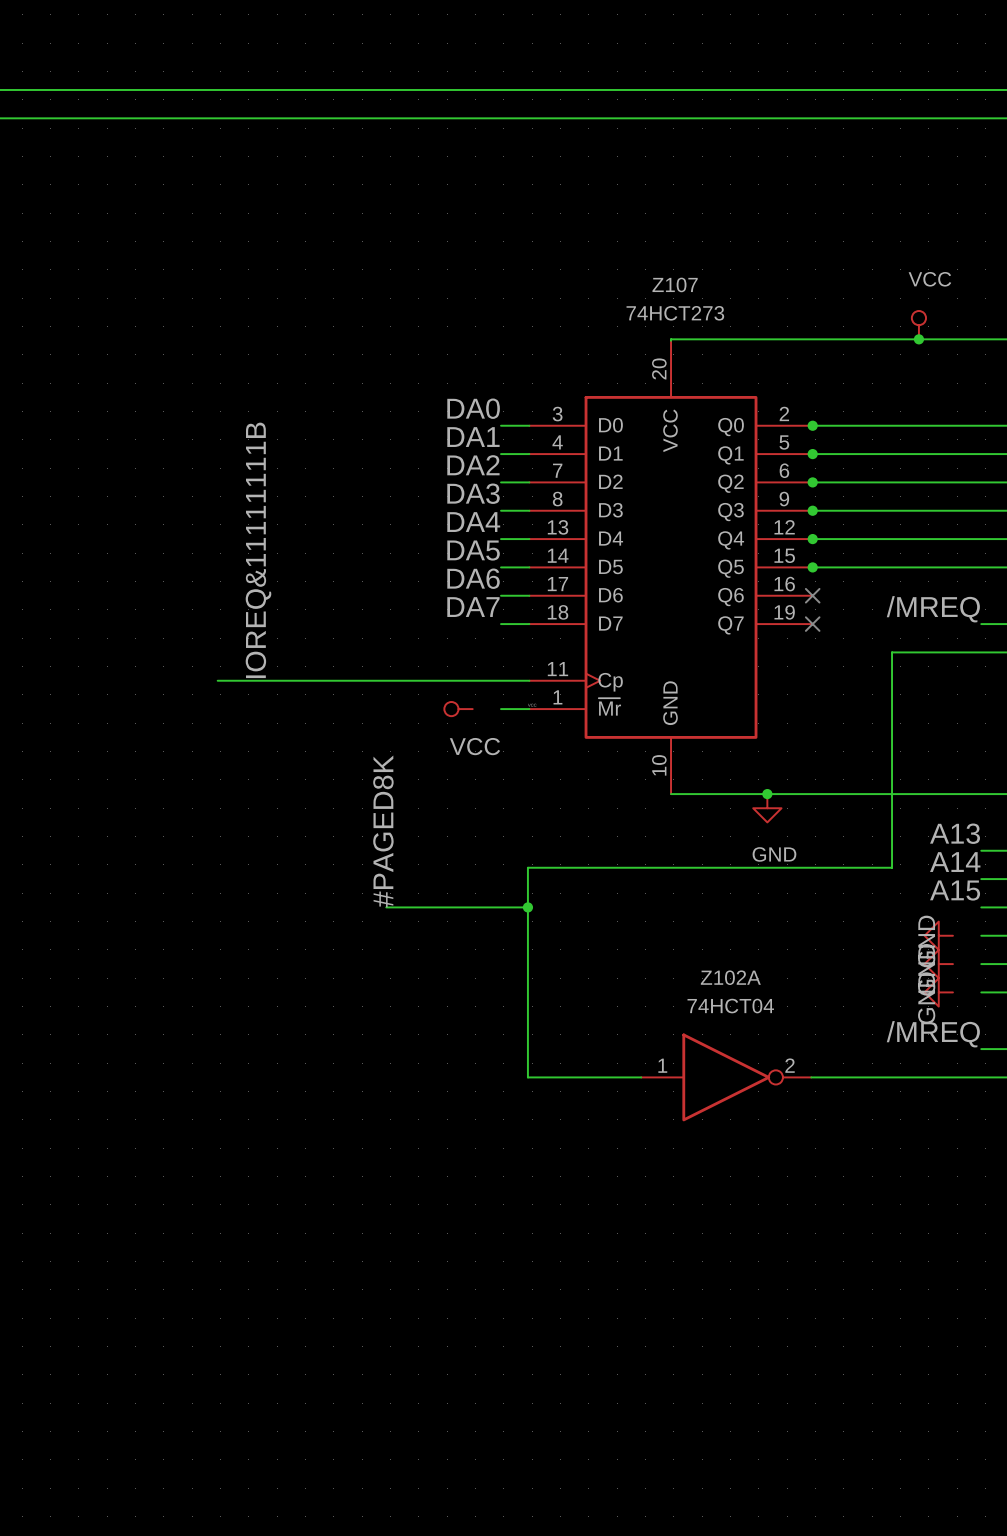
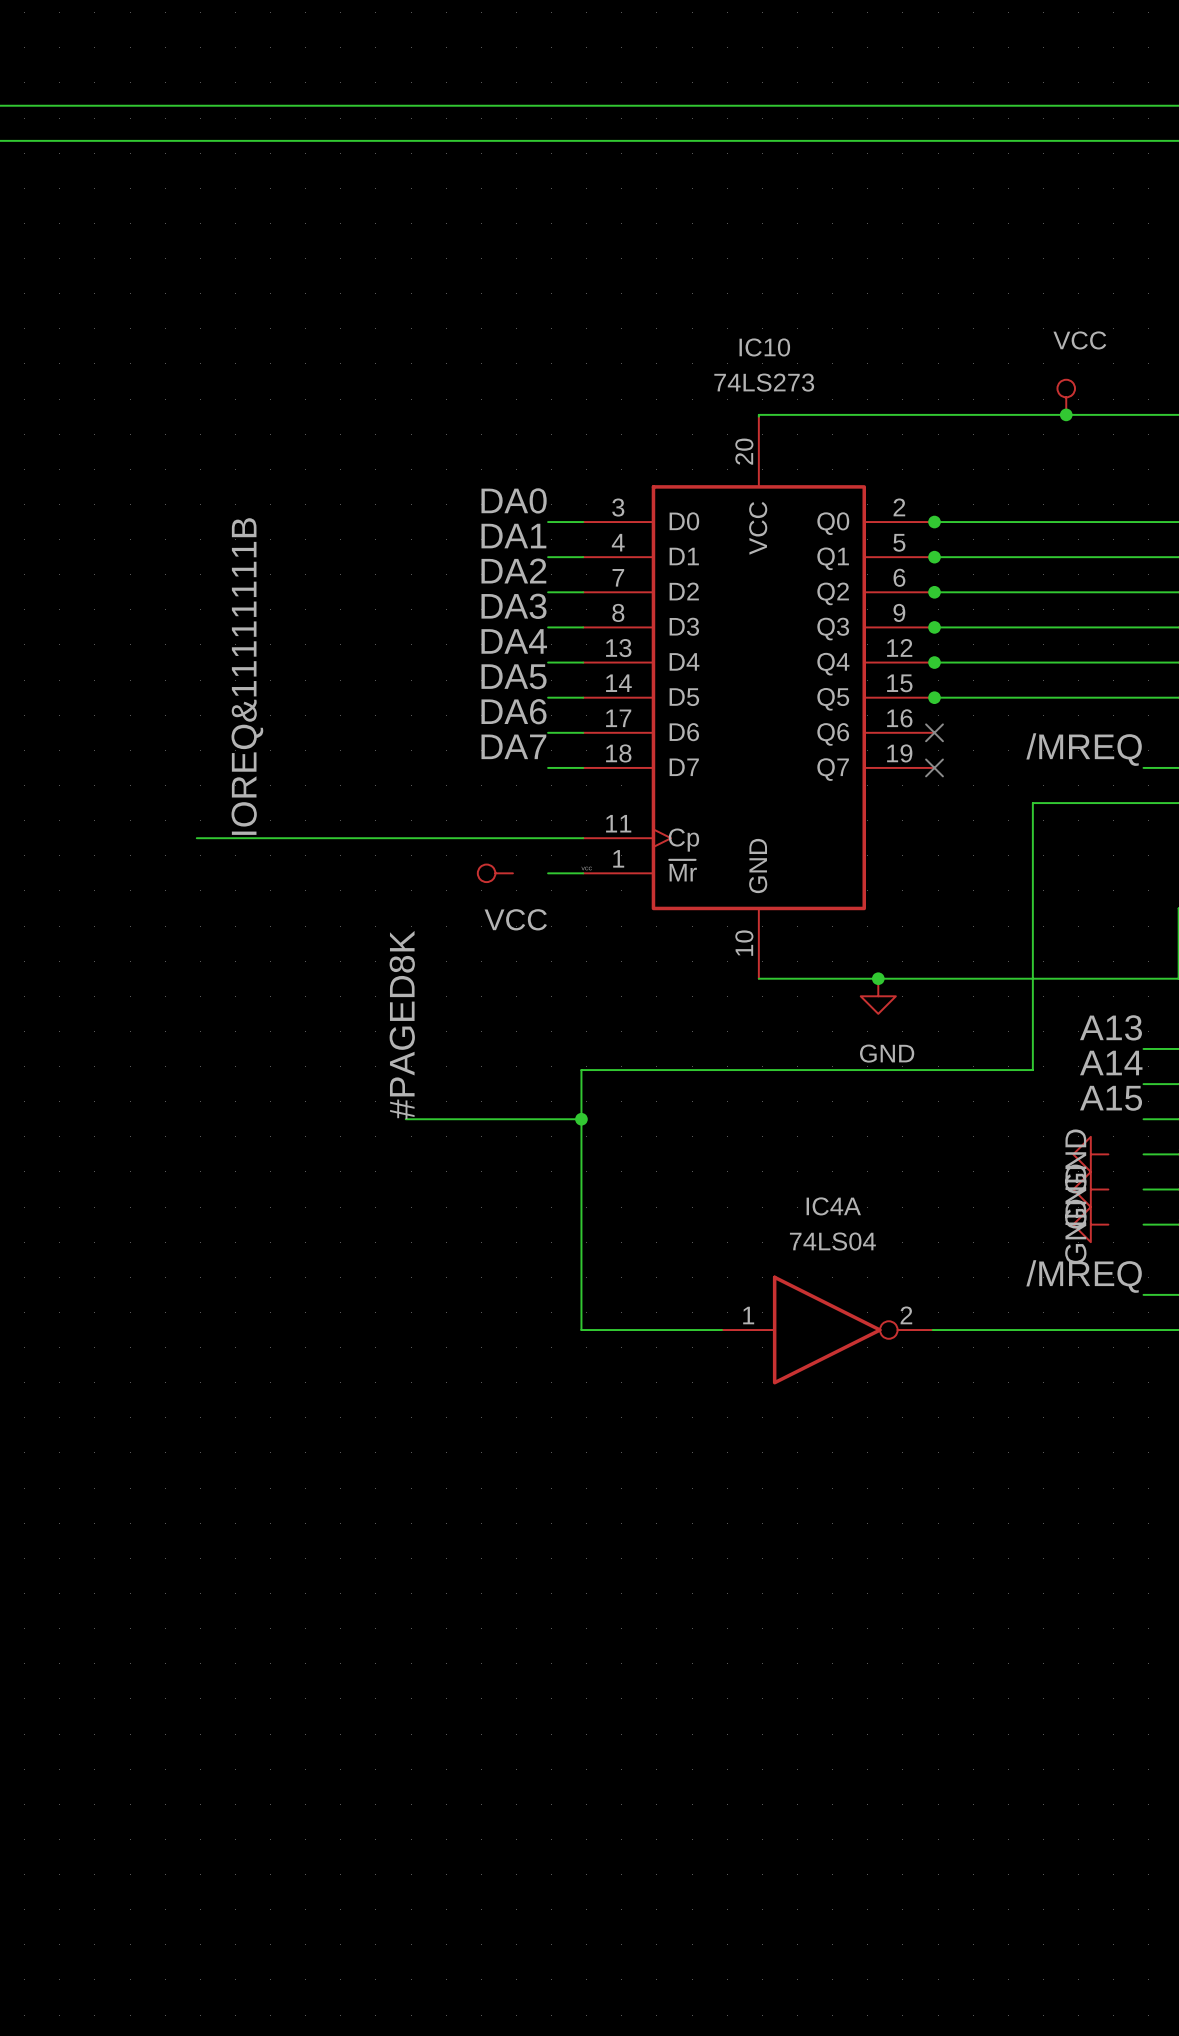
Z107 name: Z107 (675, 284) -> IC10 (764, 347)
Z107 value: 74HCT273 (675, 313) -> 74LS273 (764, 382)
Z102A name: Z102A (730, 977) -> IC4A (833, 1206)
Z102A value: 74HCT04 (730, 1006) -> 74LS04 (832, 1241)

